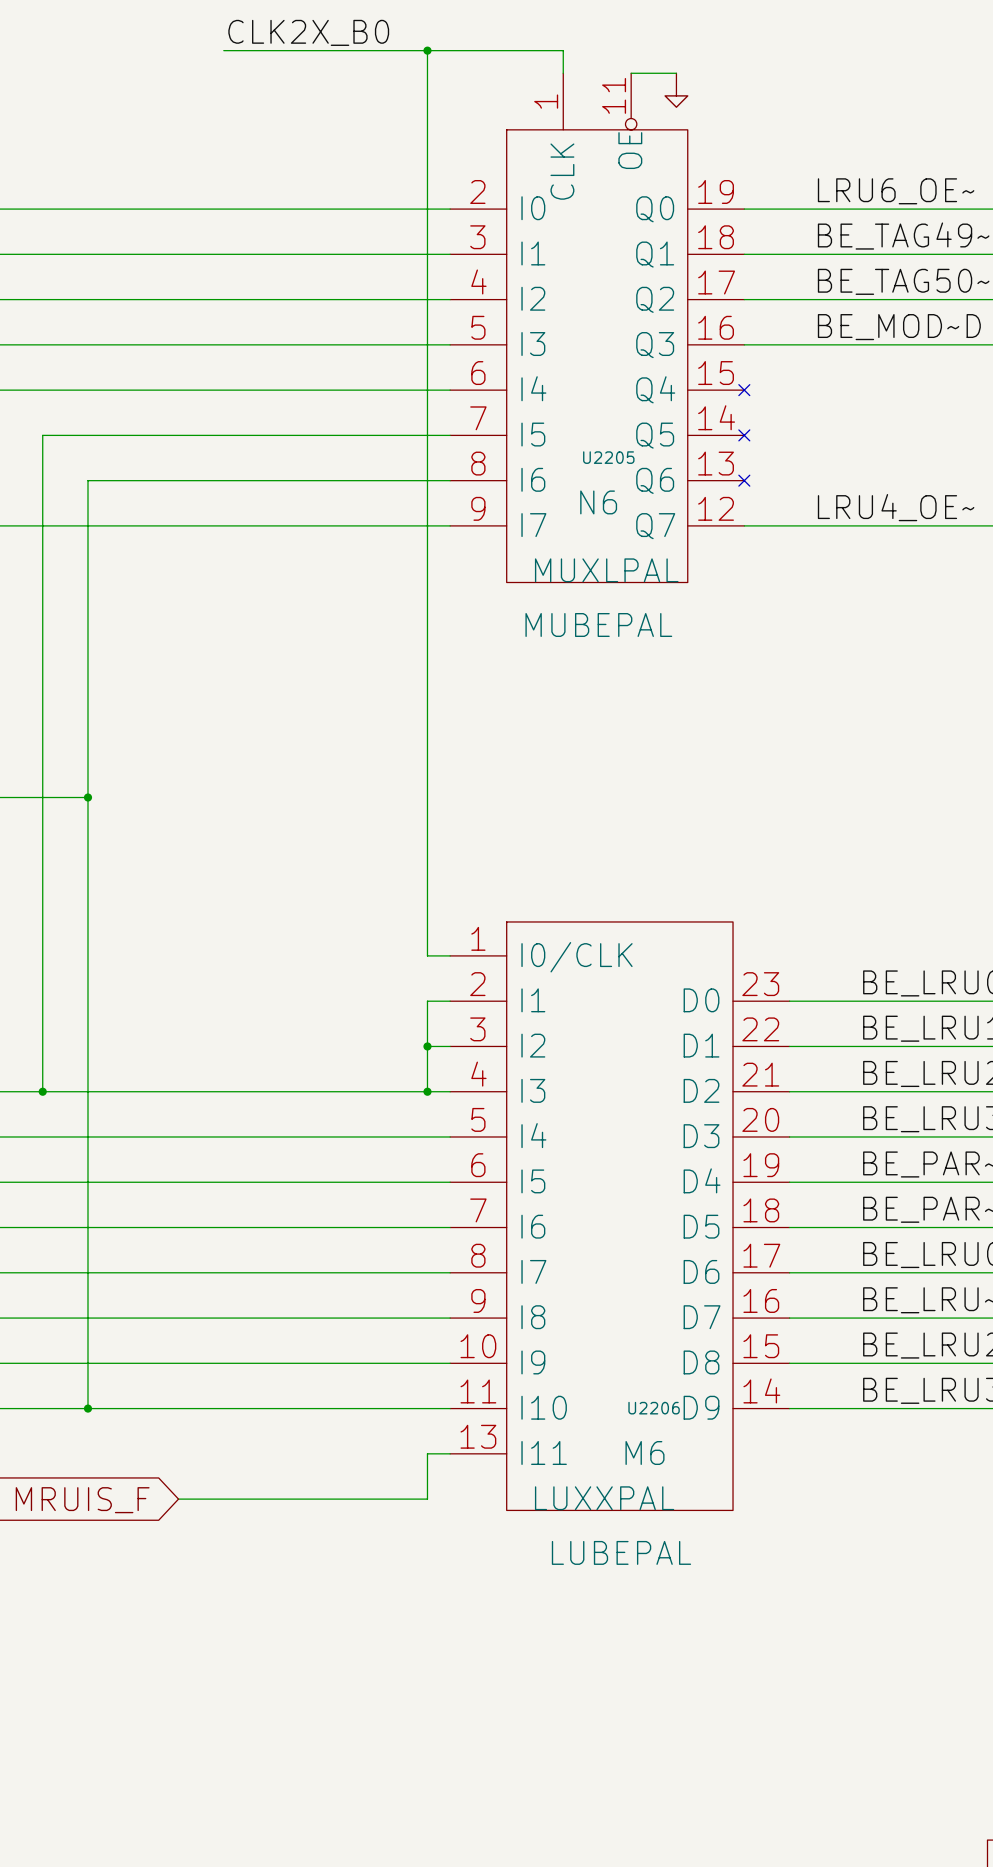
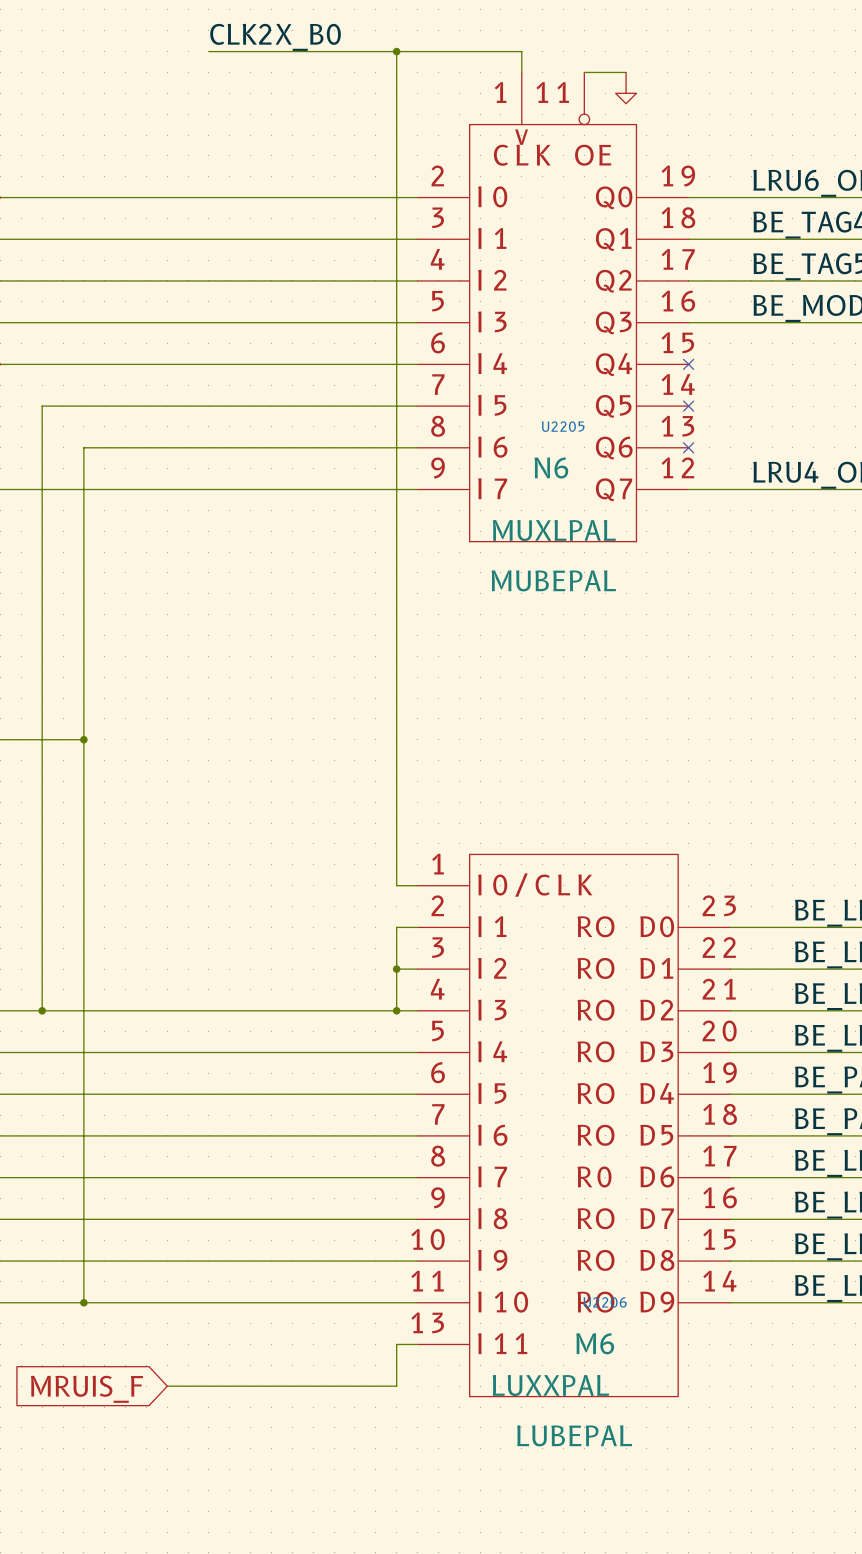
U2205 symbol: [450, 73, 745, 583] -> [417, 72, 689, 542]
U2206 symbol: [450, 921, 790, 1511] -> [417, 854, 731, 1397]

